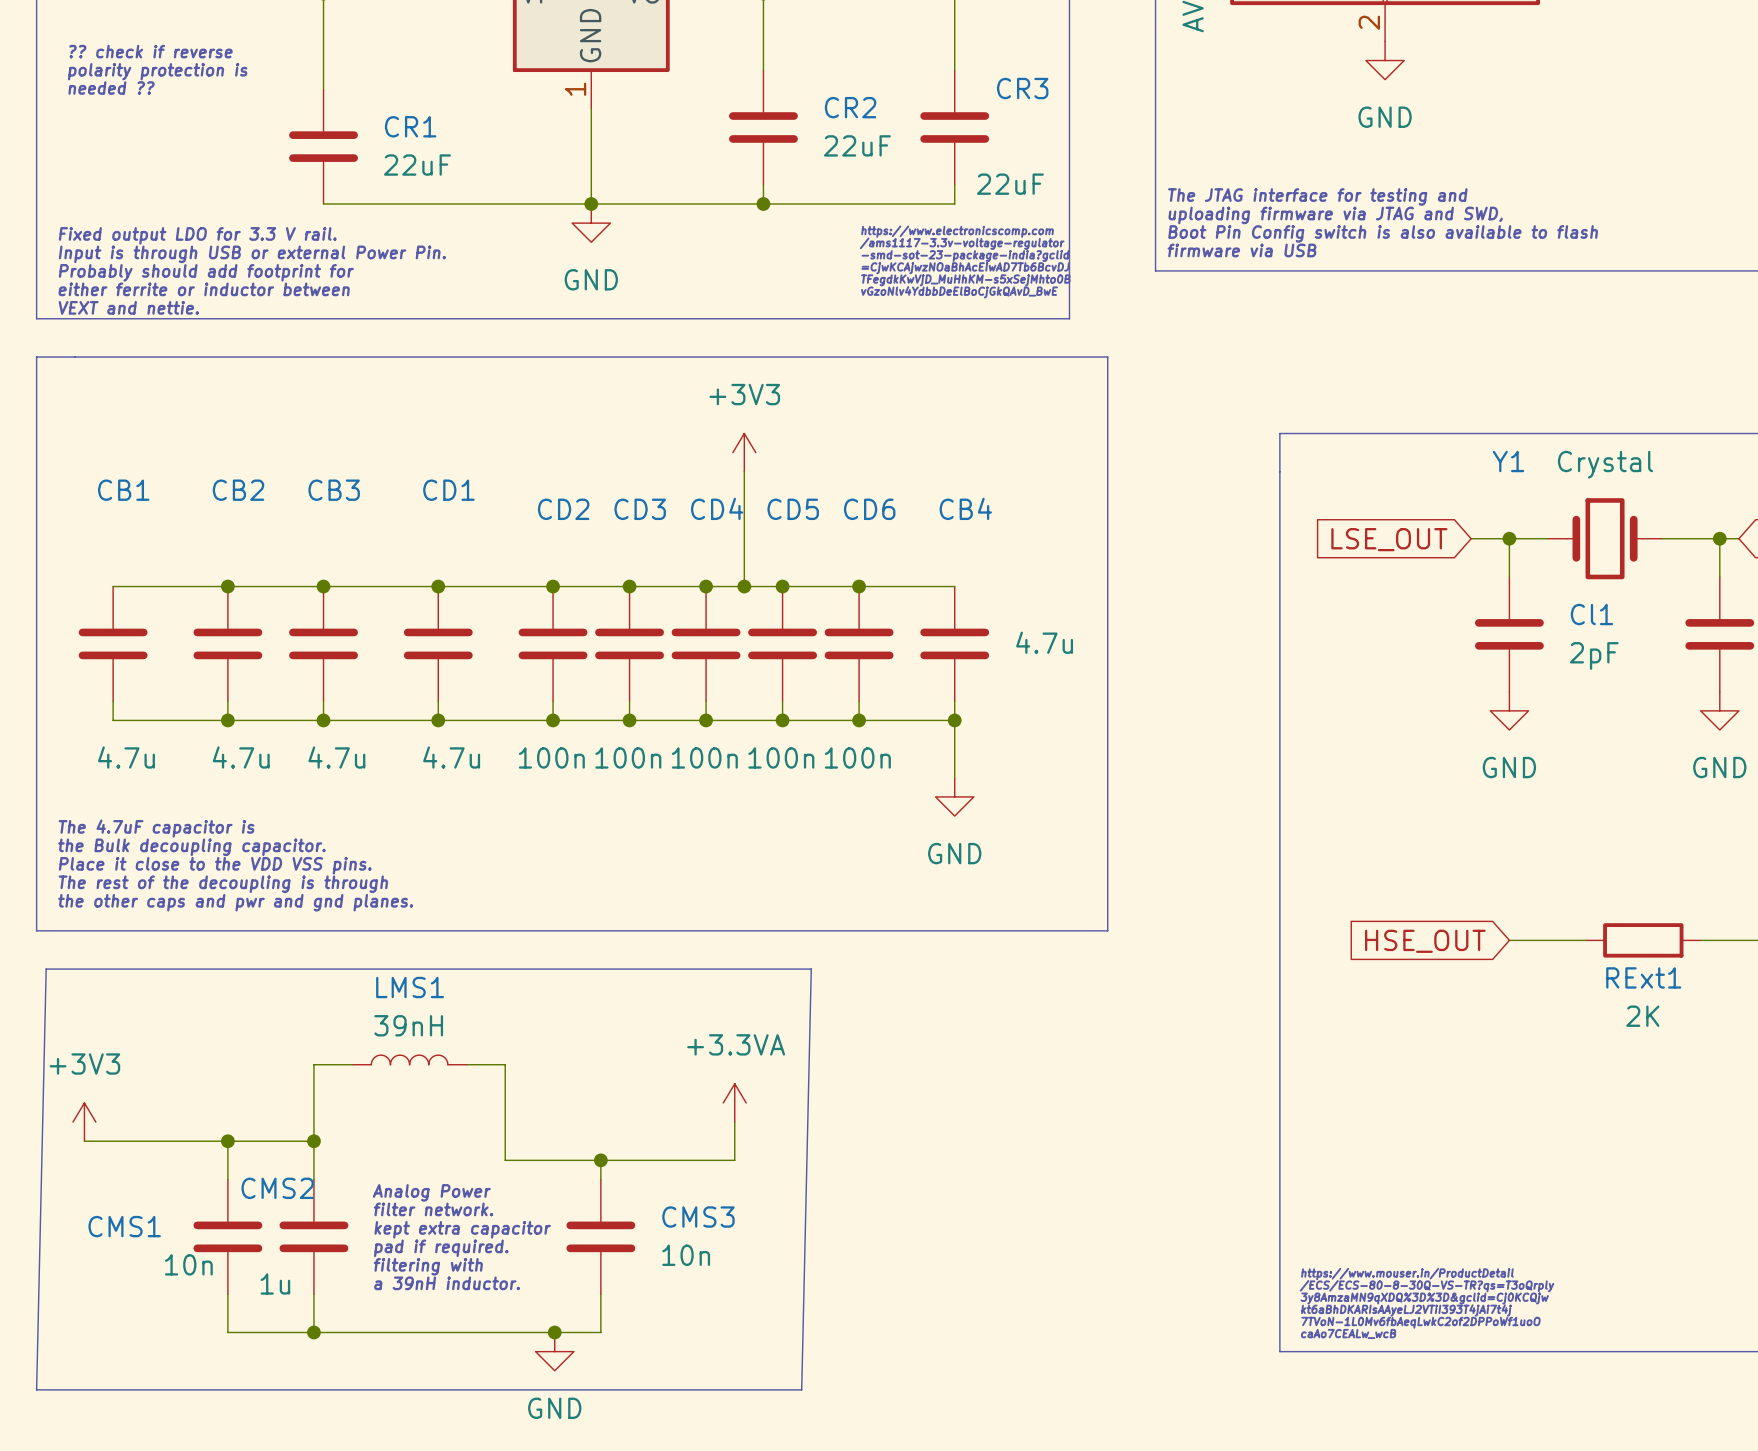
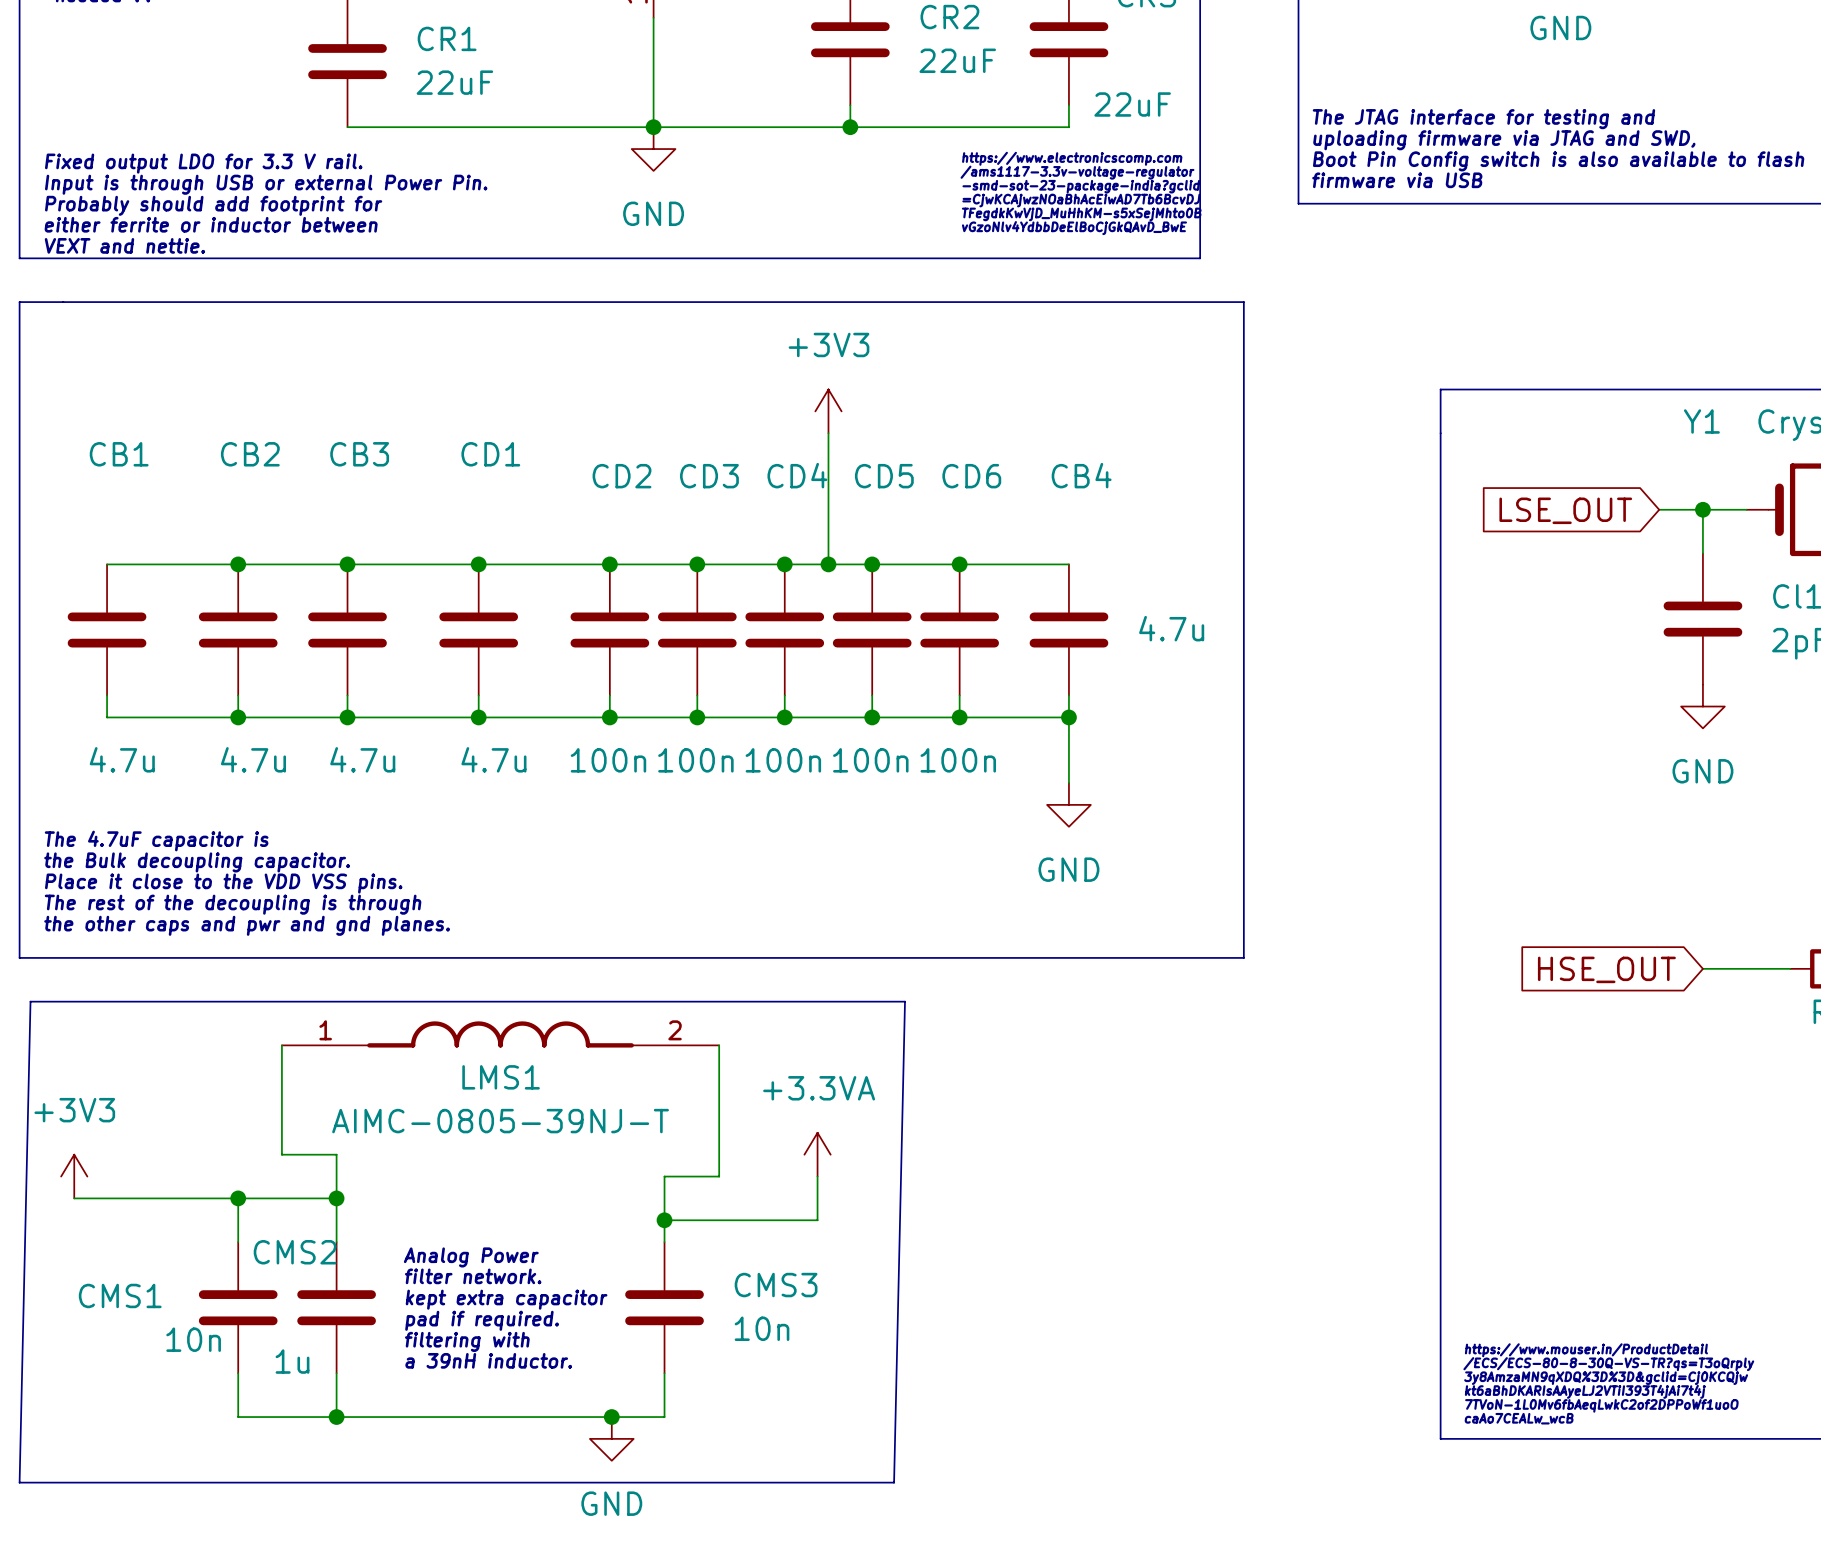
LMS1 name position: LMS1 (410, 987) -> LMS1 (501, 1077)
LMS1 value: 39nH (408, 1025) -> AIMC-0805-39NJ-T (500, 1121)
LMS1 symbol: [352, 1055, 467, 1065] -> [281, 1021, 720, 1048]
wire: (352, 1064) (313, 1064) (313, 1102) -> (281, 1045) (281, 1154) (336, 1154)
wire: (466, 1064) (505, 1064) (505, 1160) (600, 1160) -> (719, 1045) (719, 1176) (664, 1176) (664, 1220)

